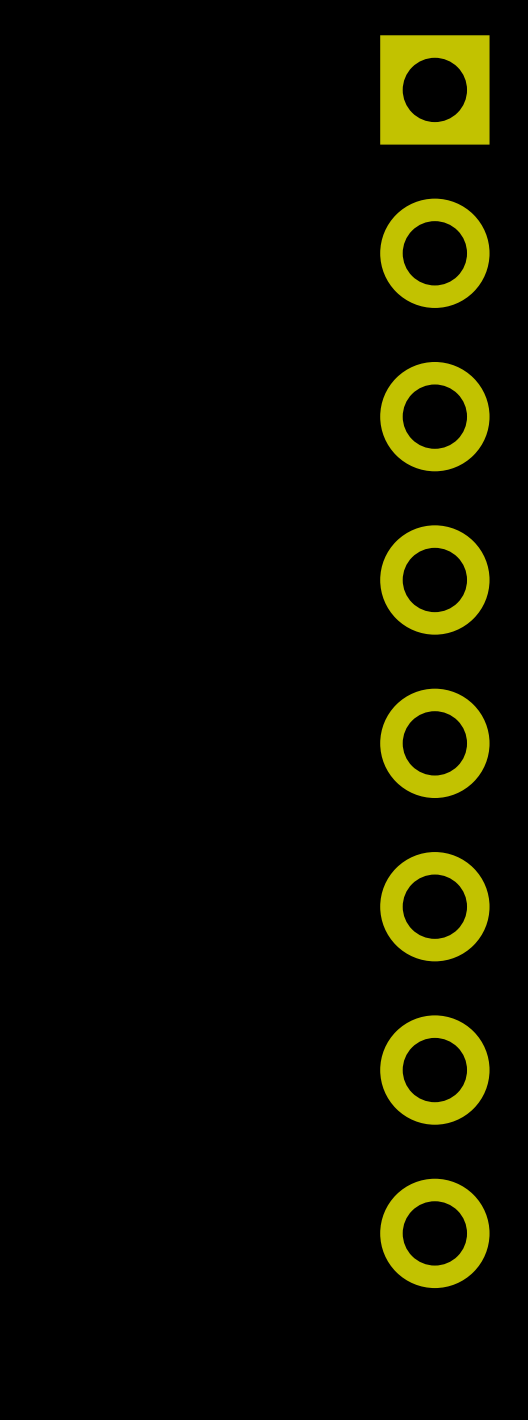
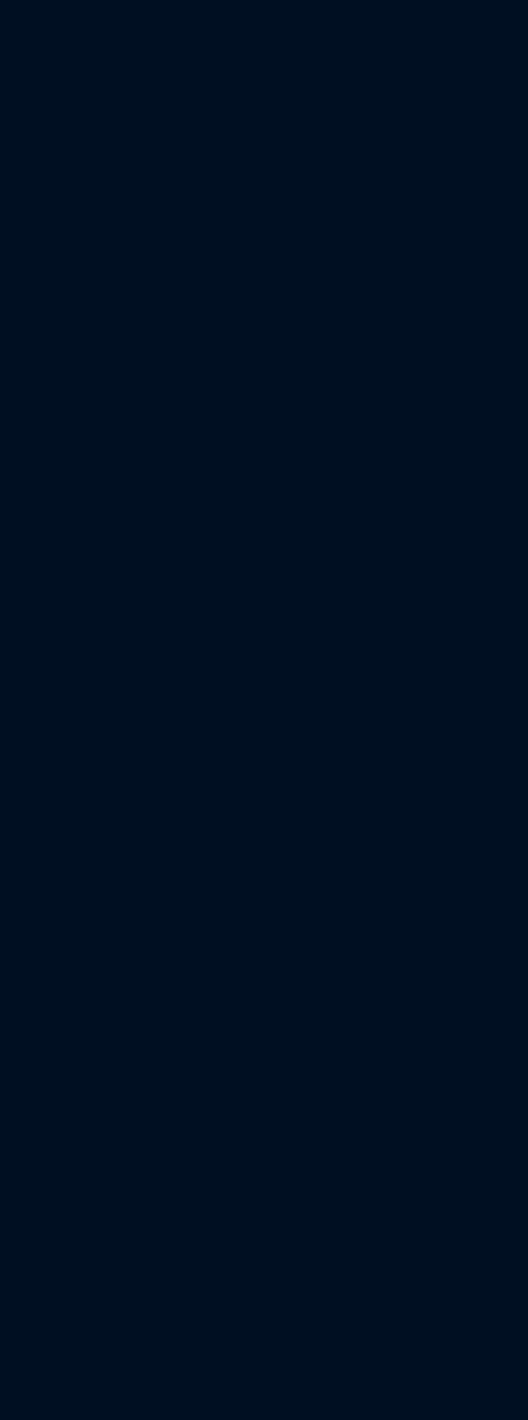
part: (434, 661) -> none

